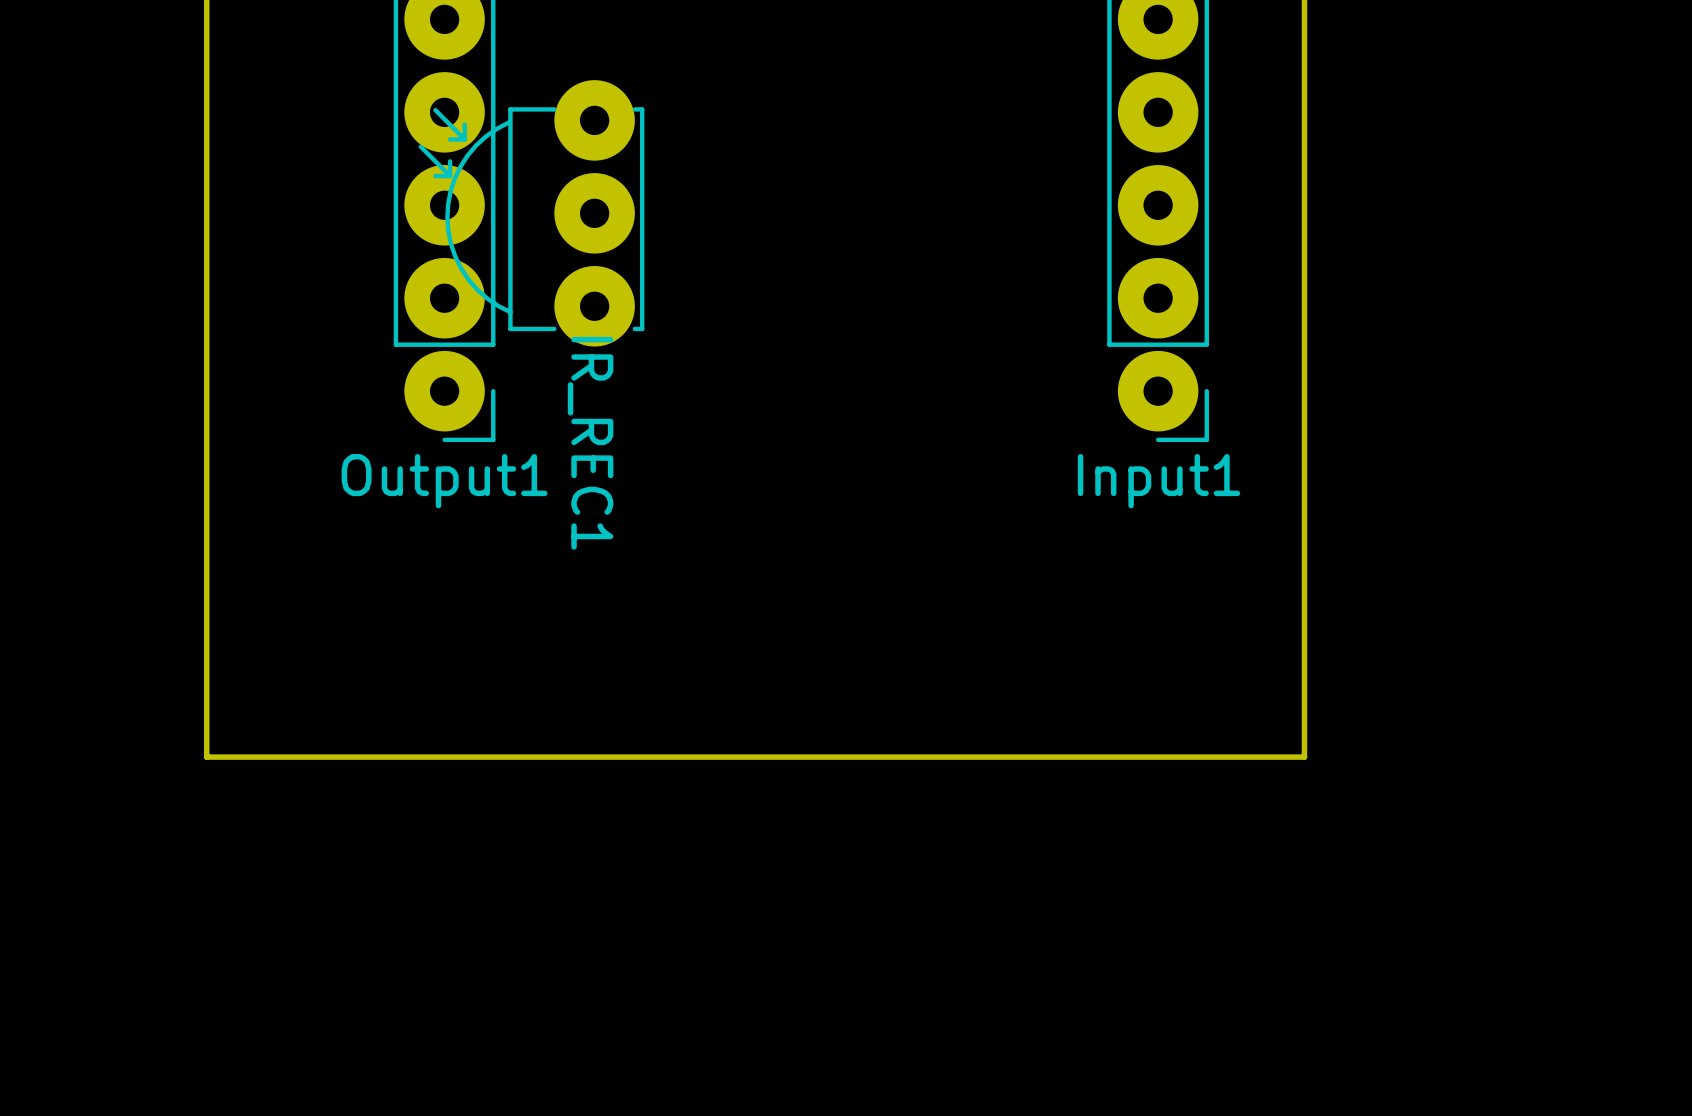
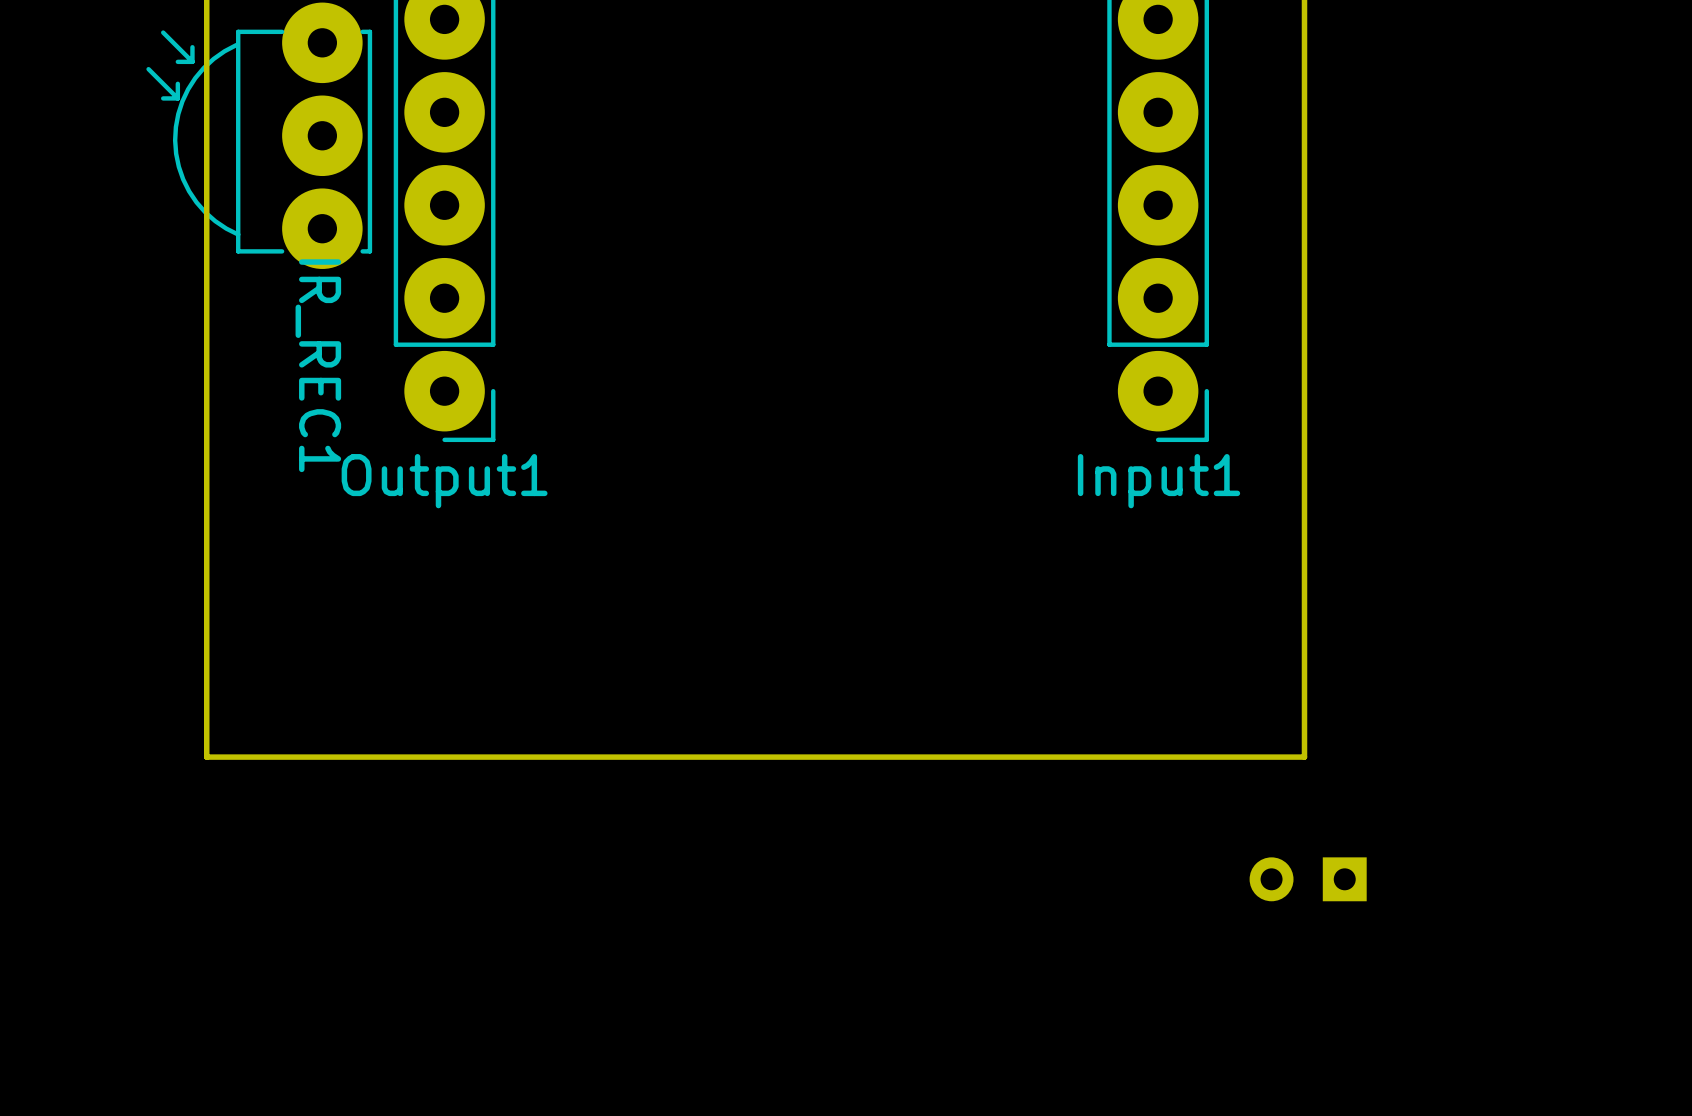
IR_REC1 position: (531, 213) -> (259, 135)
part: none -> (1308, 879)

